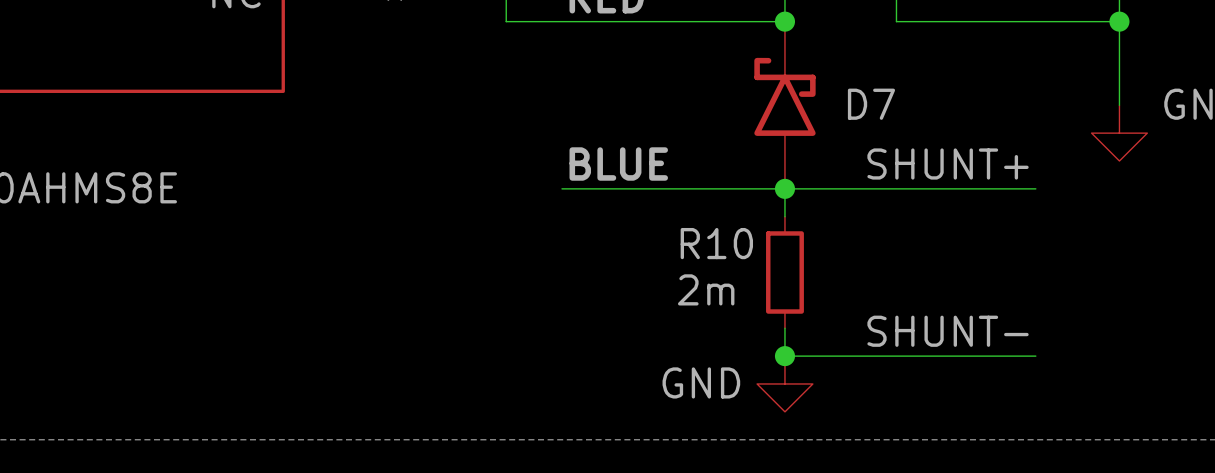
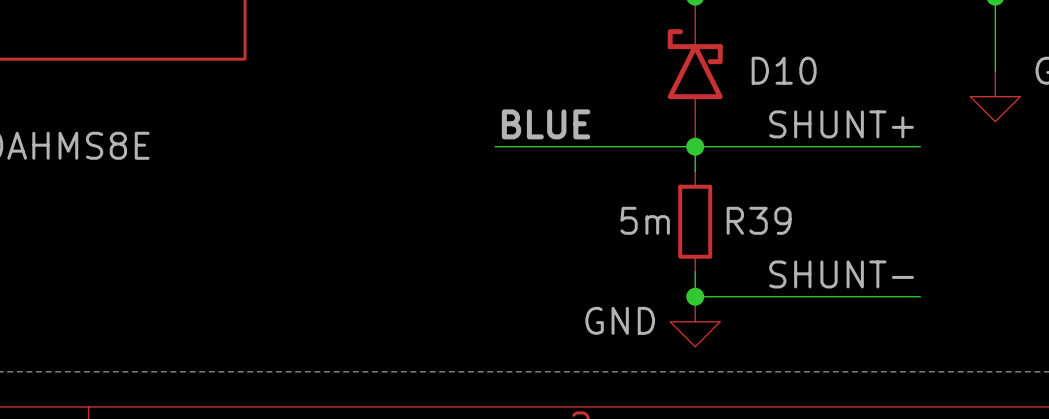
D7 name: D7 (871, 104) -> D10 (784, 70)
R10 name: R10 (716, 243) -> R39 (759, 220)
R10 value: 2m (706, 289) -> 5m (645, 220)

